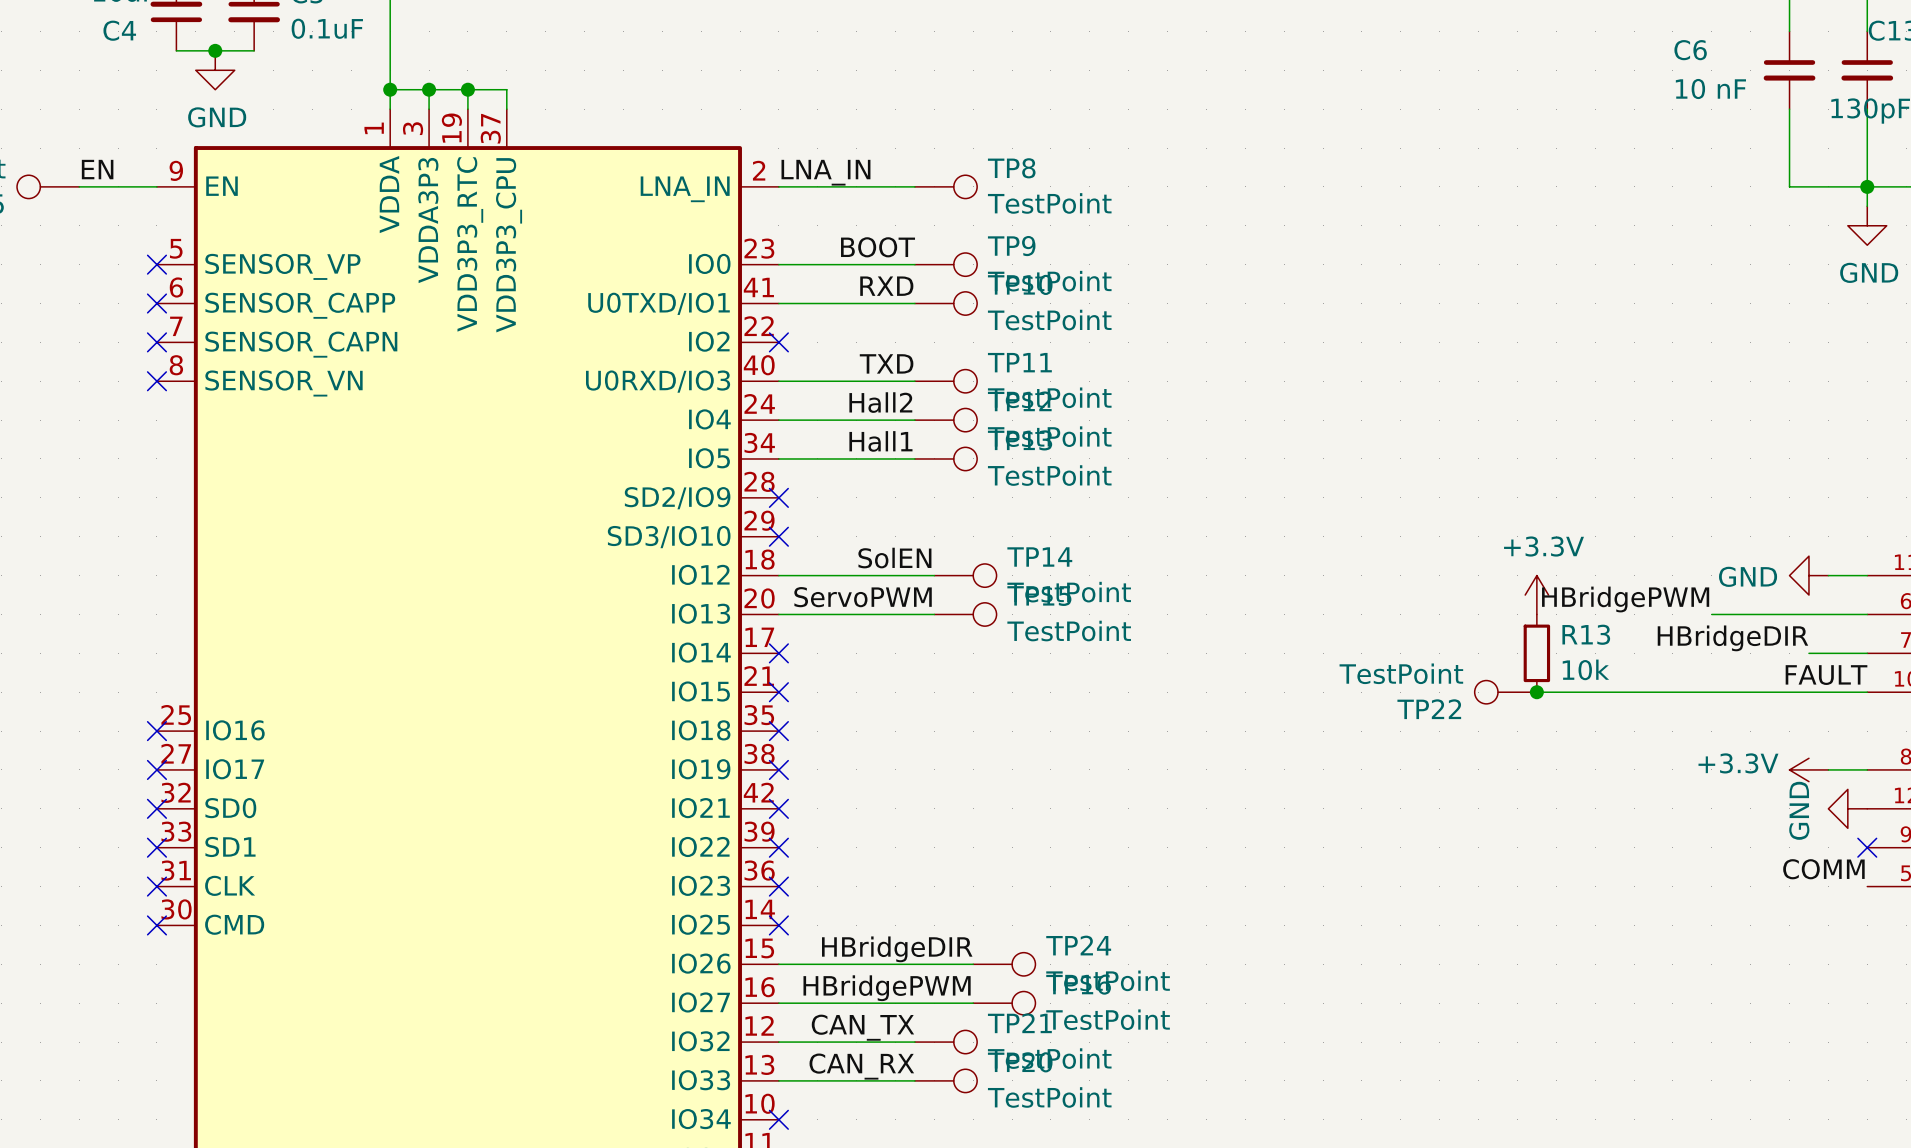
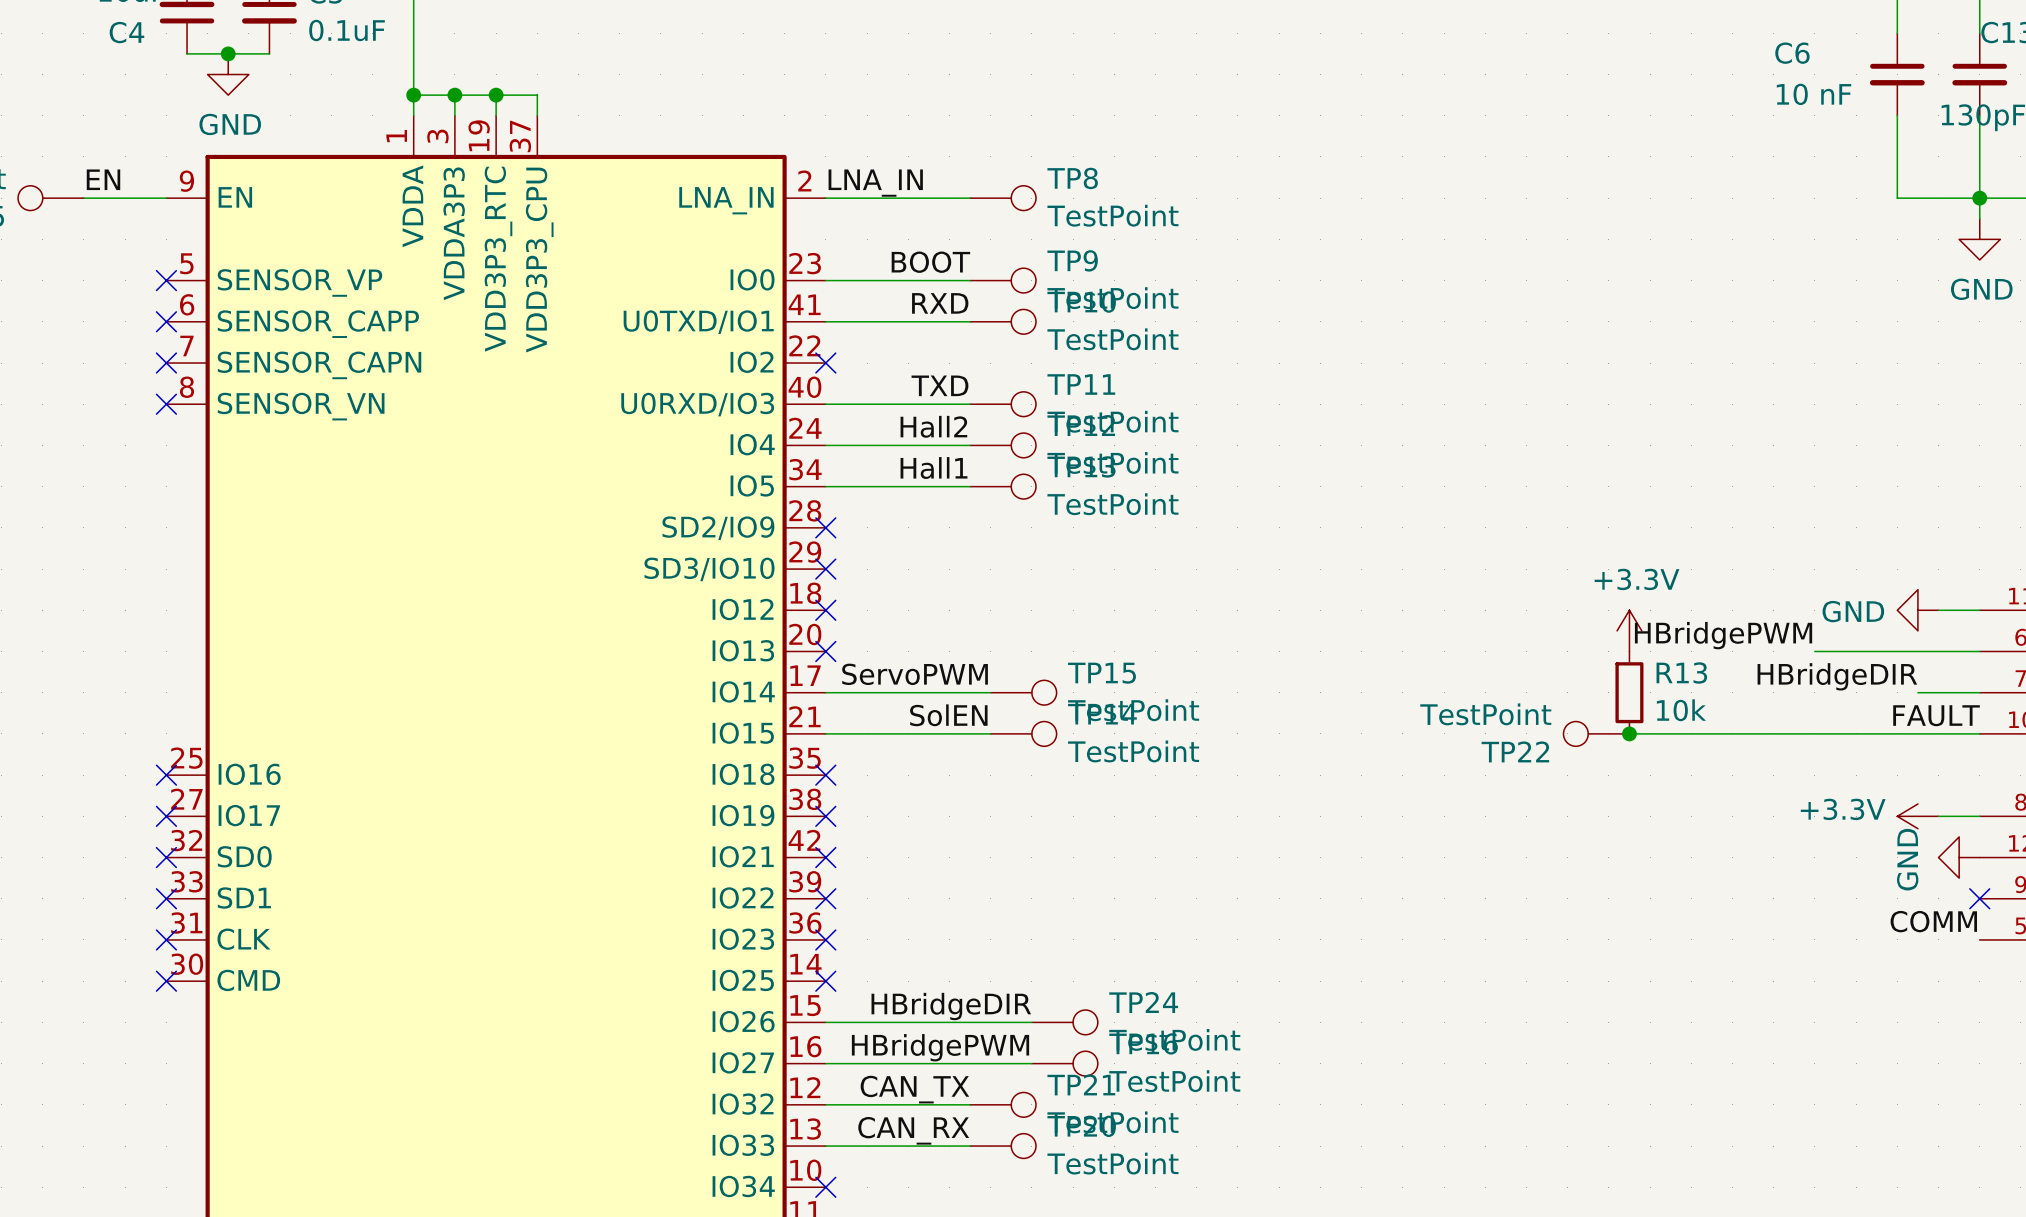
label position: SolEN (894, 558) -> SolEN (948, 715)
wire: (778, 575) (934, 575) -> (825, 692) (990, 692)
no-connect mark: none -> (825, 610)
TP14 position: (965, 575) -> (1023, 733)
label position: ServoPWM (863, 597) -> ServoPWM (915, 674)
wire: (778, 614) (934, 614) -> (825, 733) (990, 733)
no-connect mark: none -> (825, 651)
TP15 position: (965, 614) -> (1023, 692)
no-connect mark: (778, 653) -> none
no-connect mark: (778, 692) -> none

